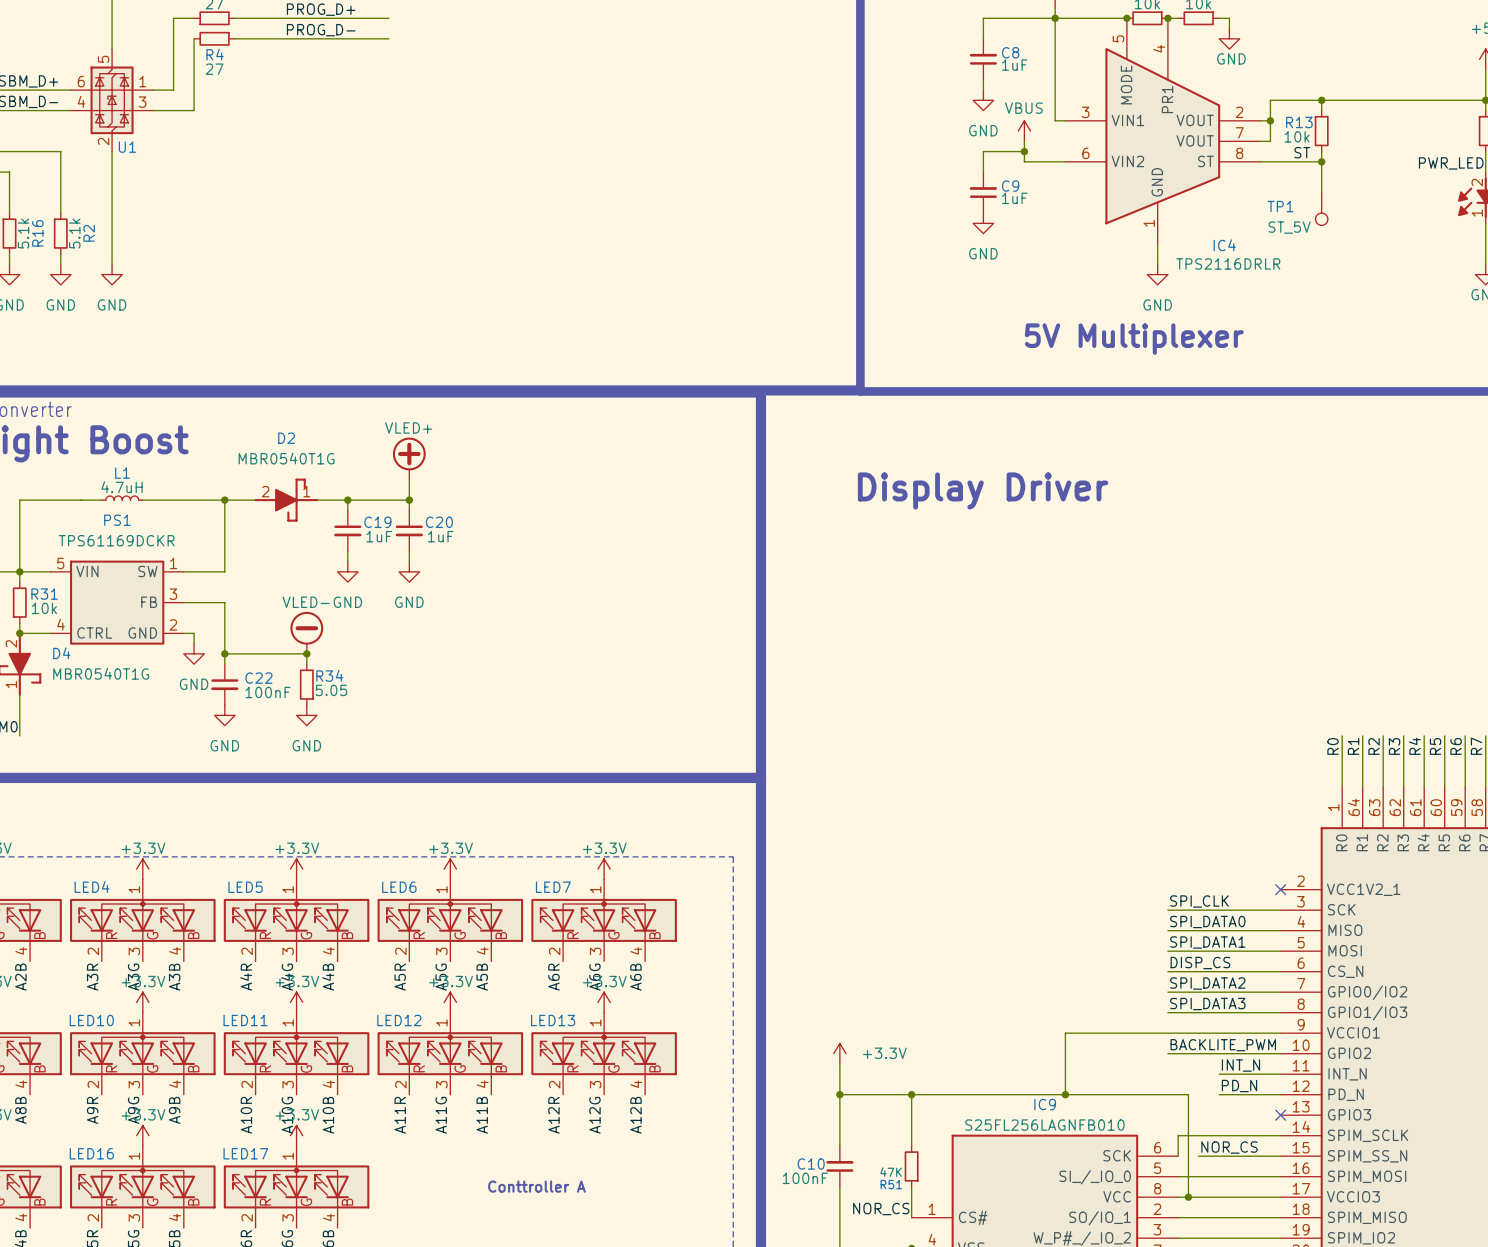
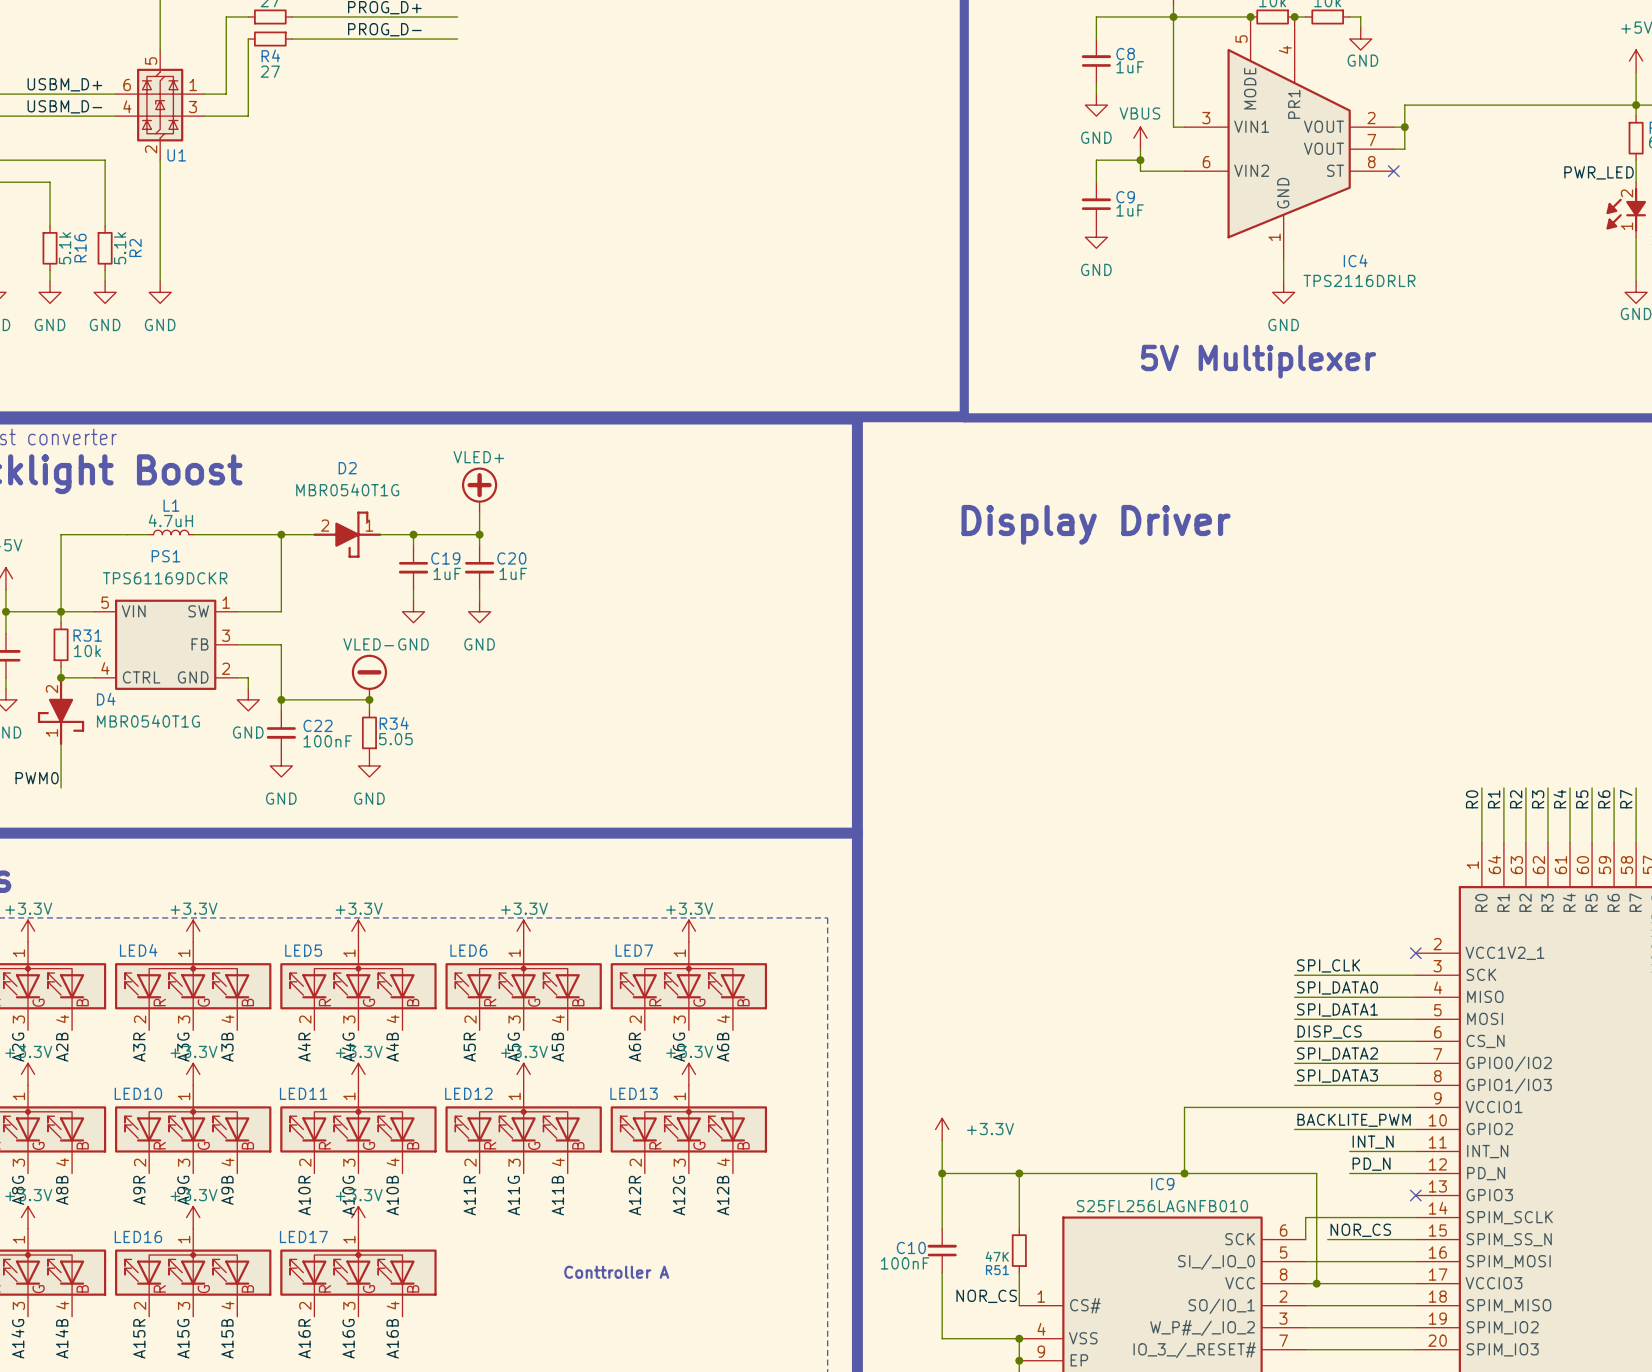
wire: (1321, 100) (1321, 110) -> none
junction: (1321, 100) -> none
R13: 10k (1321, 131) -> none
wire: (1321, 151) (1321, 192) -> none
label: ST (1302, 152) -> none
wire: (1260, 161) (1321, 161) -> none
no-connect mark: none -> (1393, 171)
junction: (1321, 161) -> none
TP1: ST_5V (1321, 208) -> none

